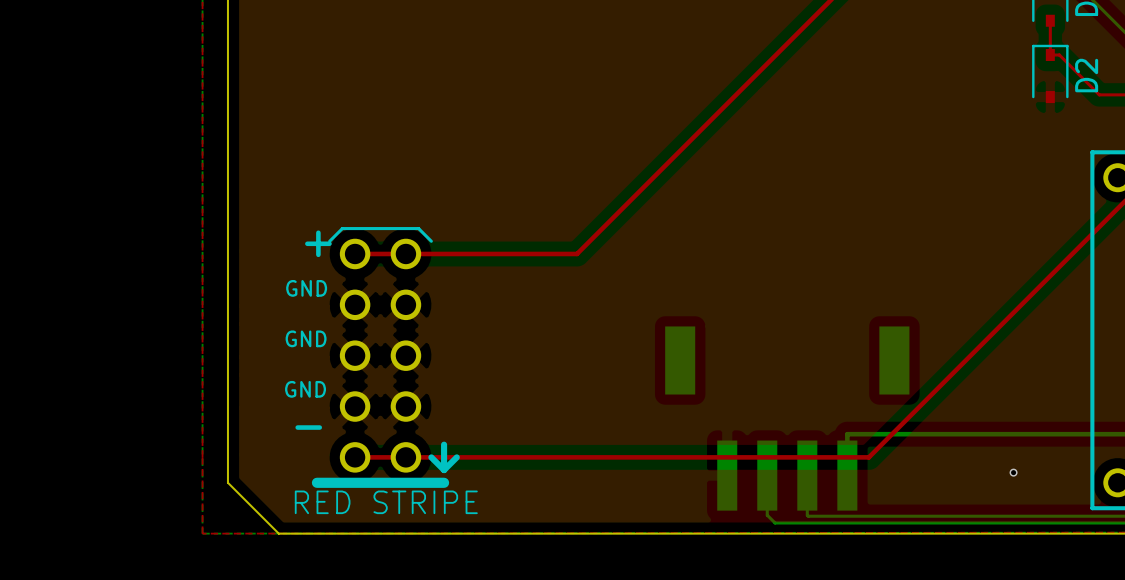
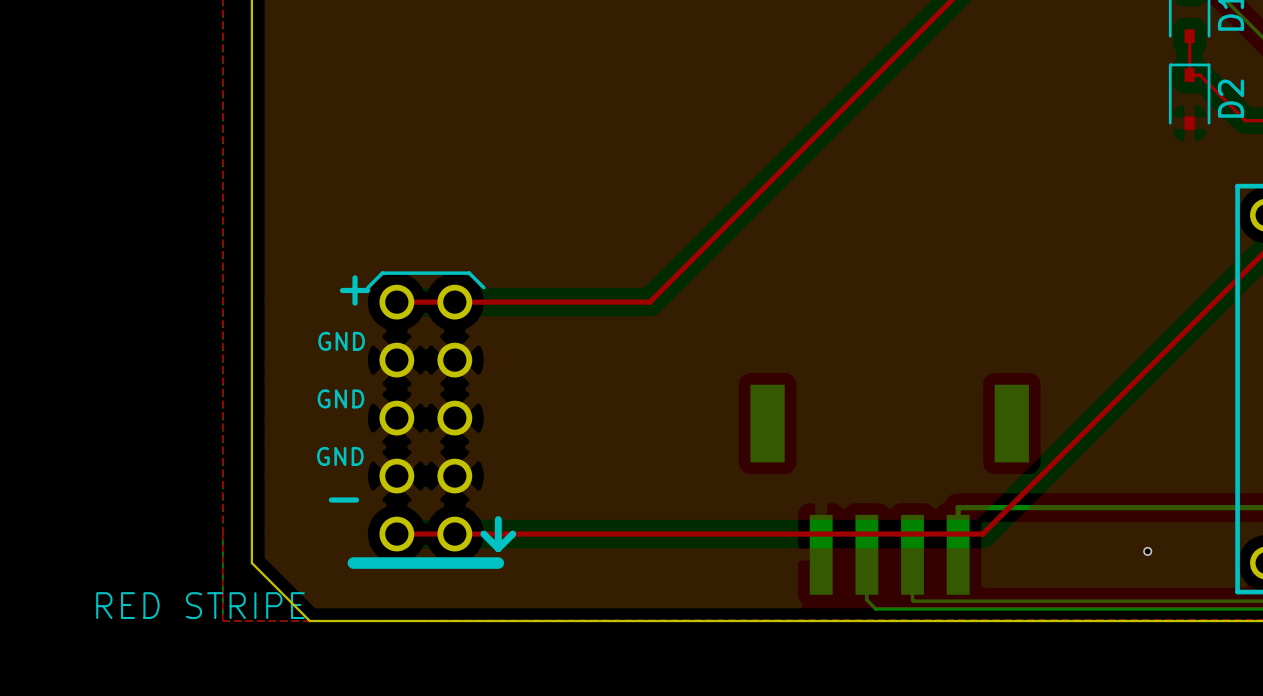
part text position: RED STRIPE (386, 502) -> RED STRIPE (200, 605)

